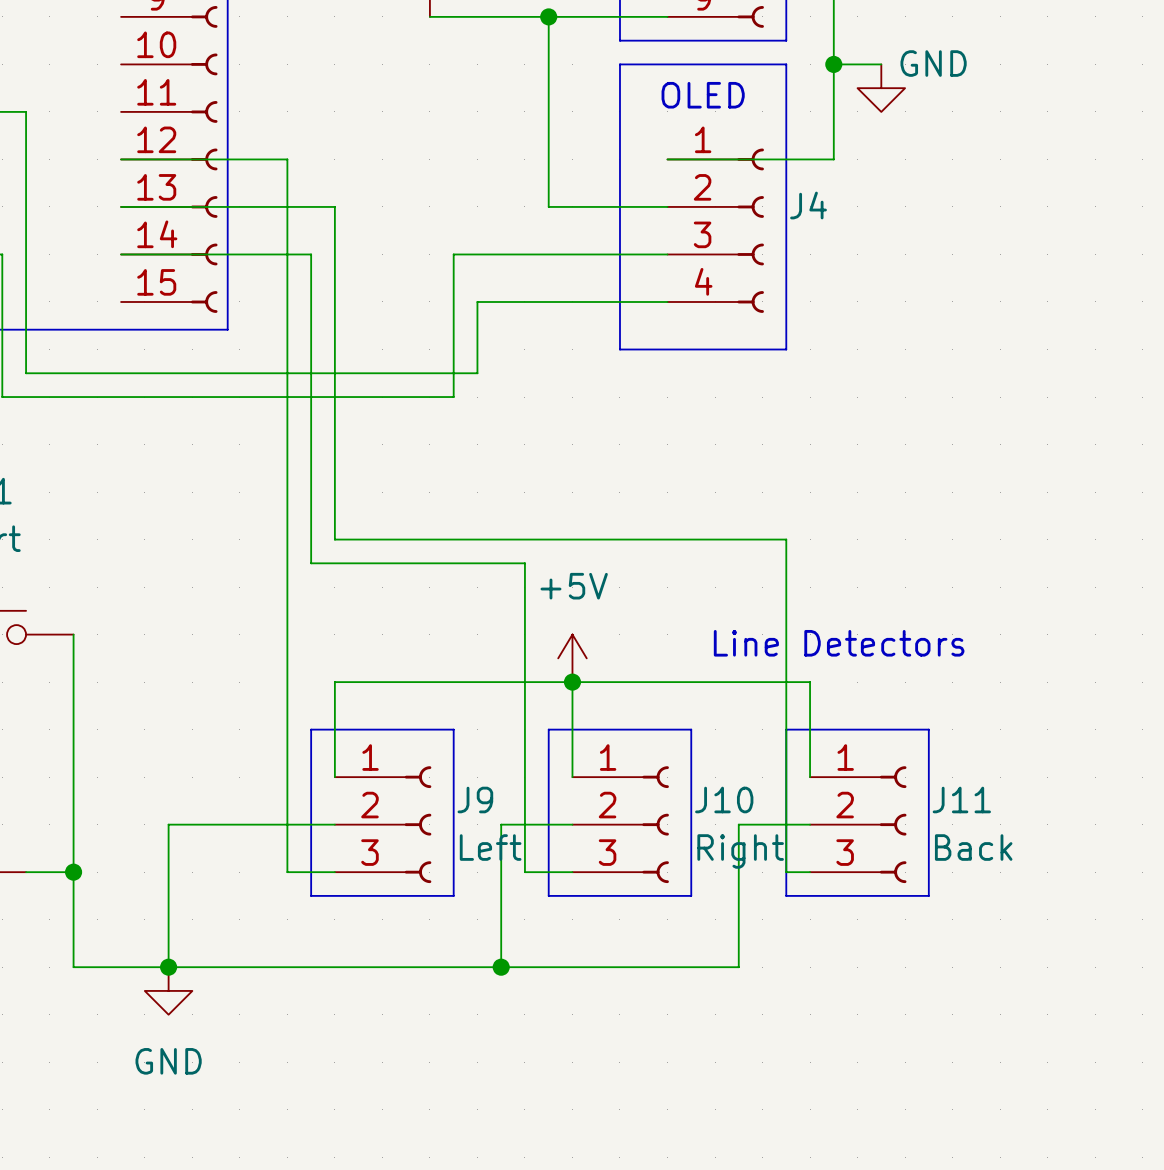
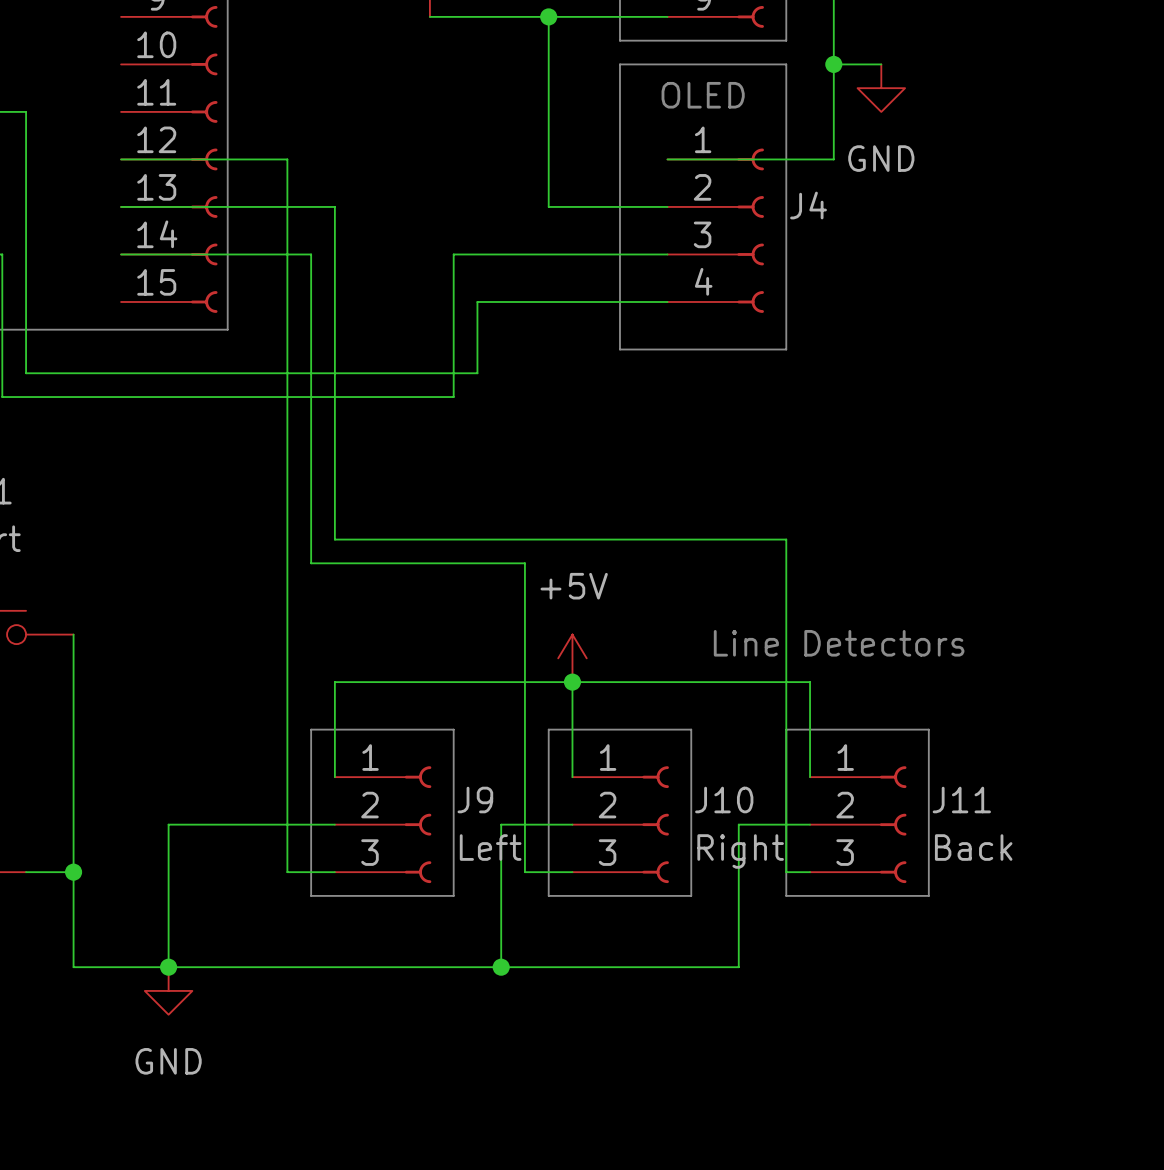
power symbol text position: GND (933, 63) -> GND (881, 158)

